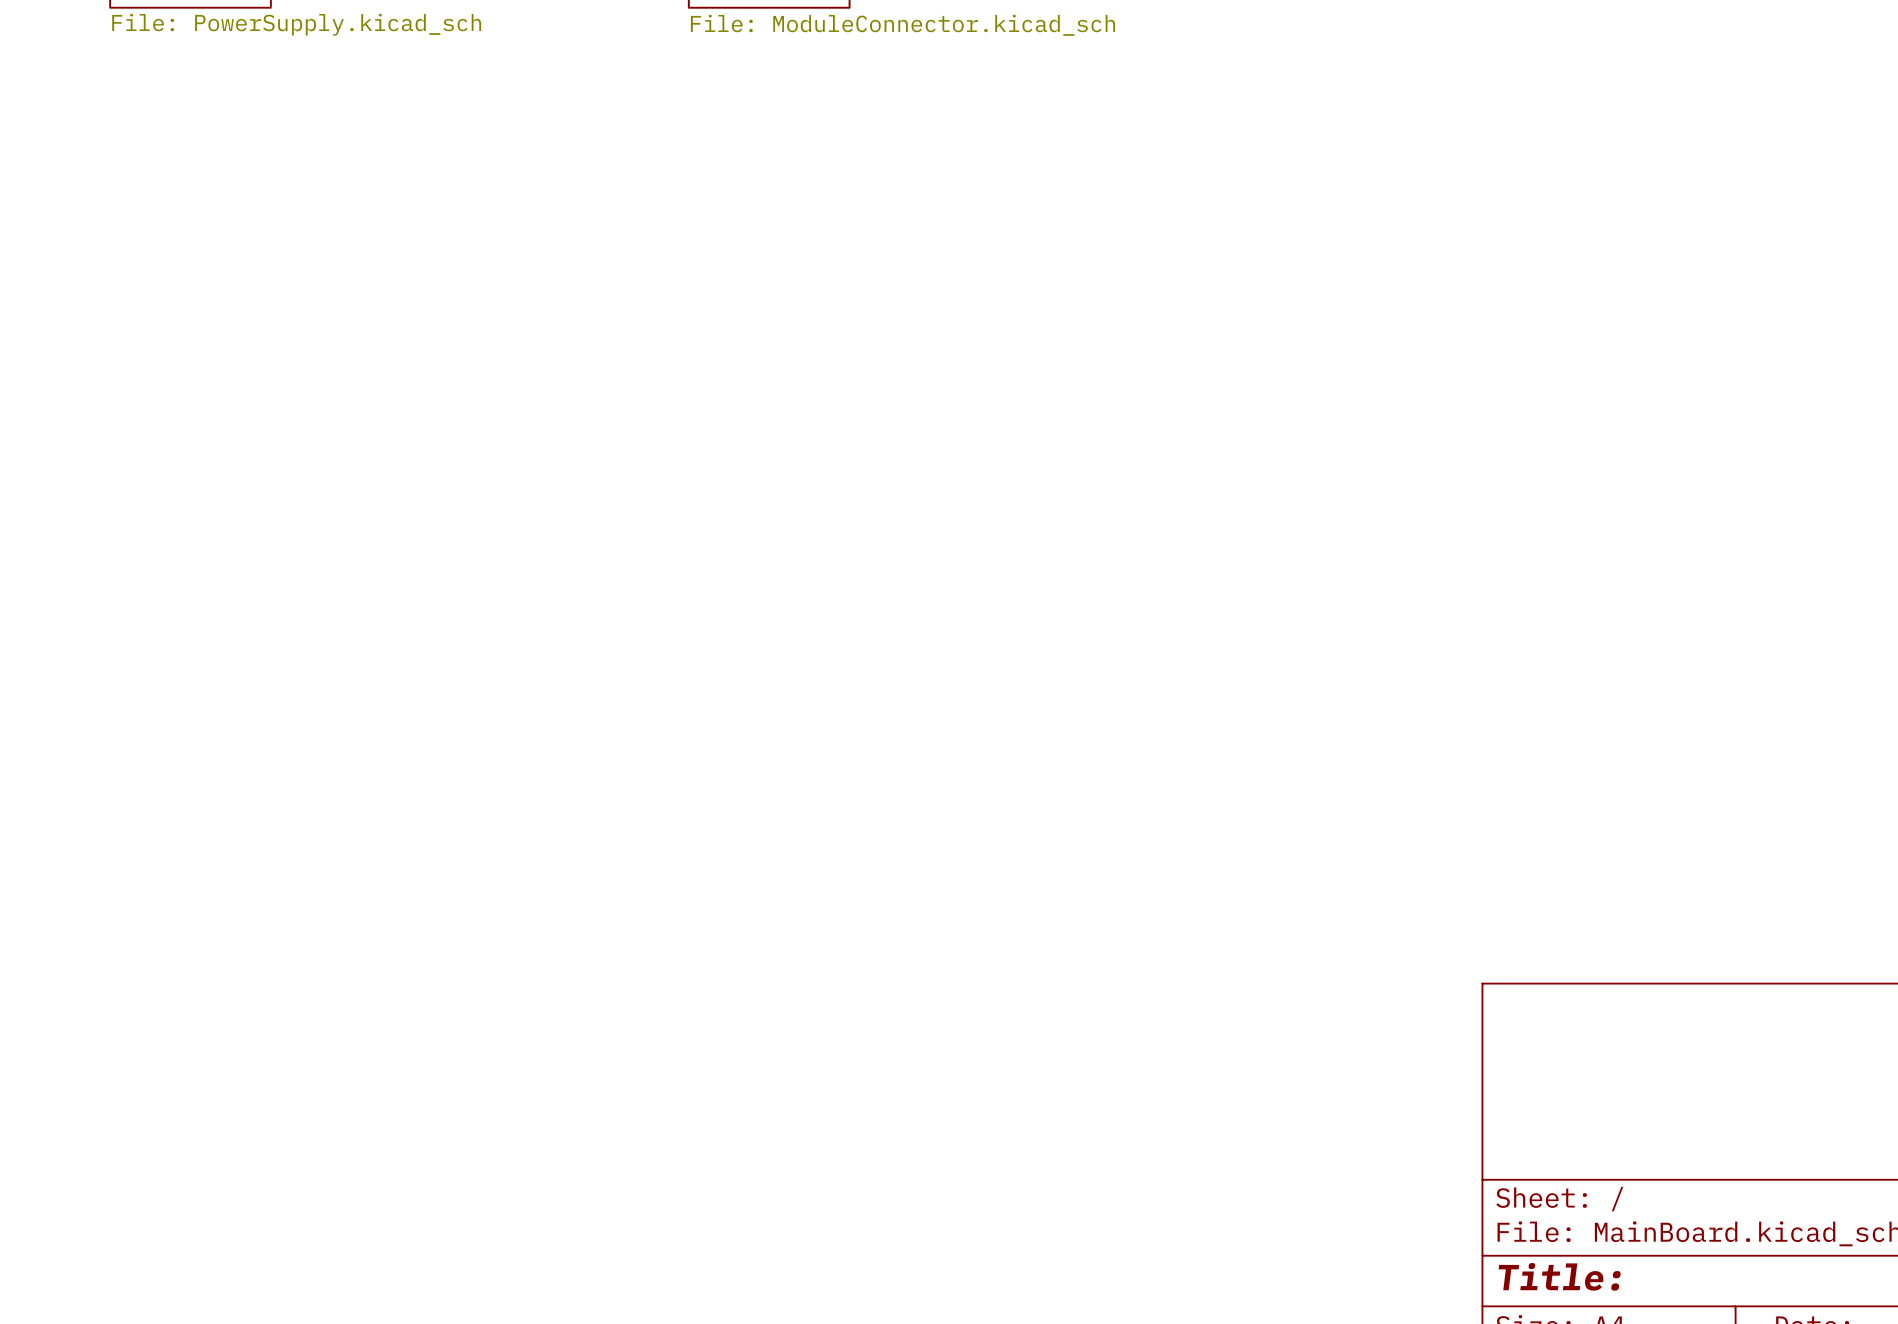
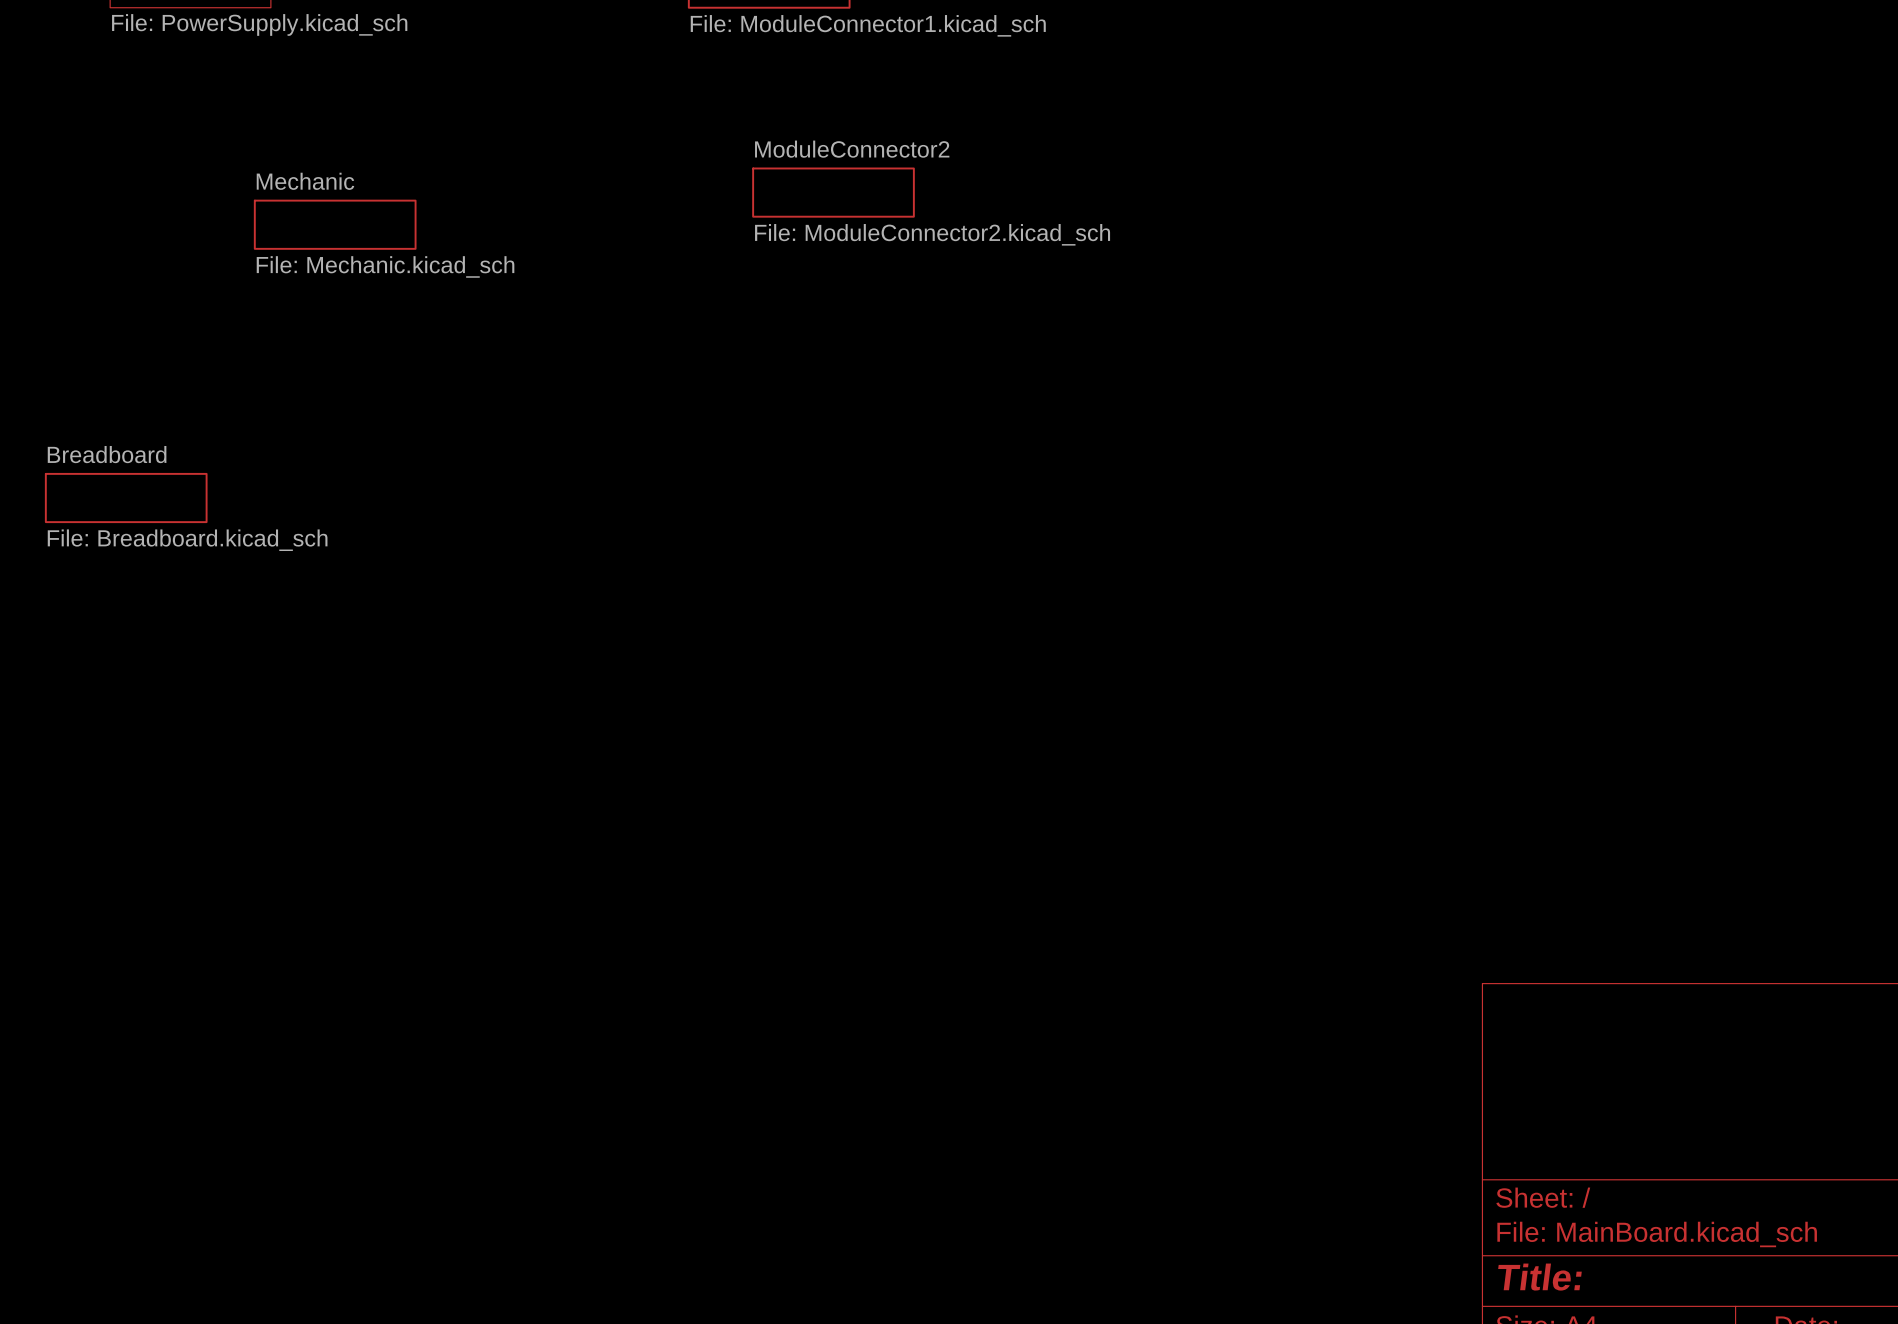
sheet value: File: ModuleConnector.kicad_sch (902, 25) -> File: ModuleConnector1.kicad_sch (868, 25)
sheet ModuleConnector2: none -> File: ModuleConnector2.kicad_sch (833, 192)
sheet Mechanic: none -> File: Mechanic.kicad_sch (335, 224)
sheet Breadboard: none -> File: Breadboard.kicad_sch (126, 498)

